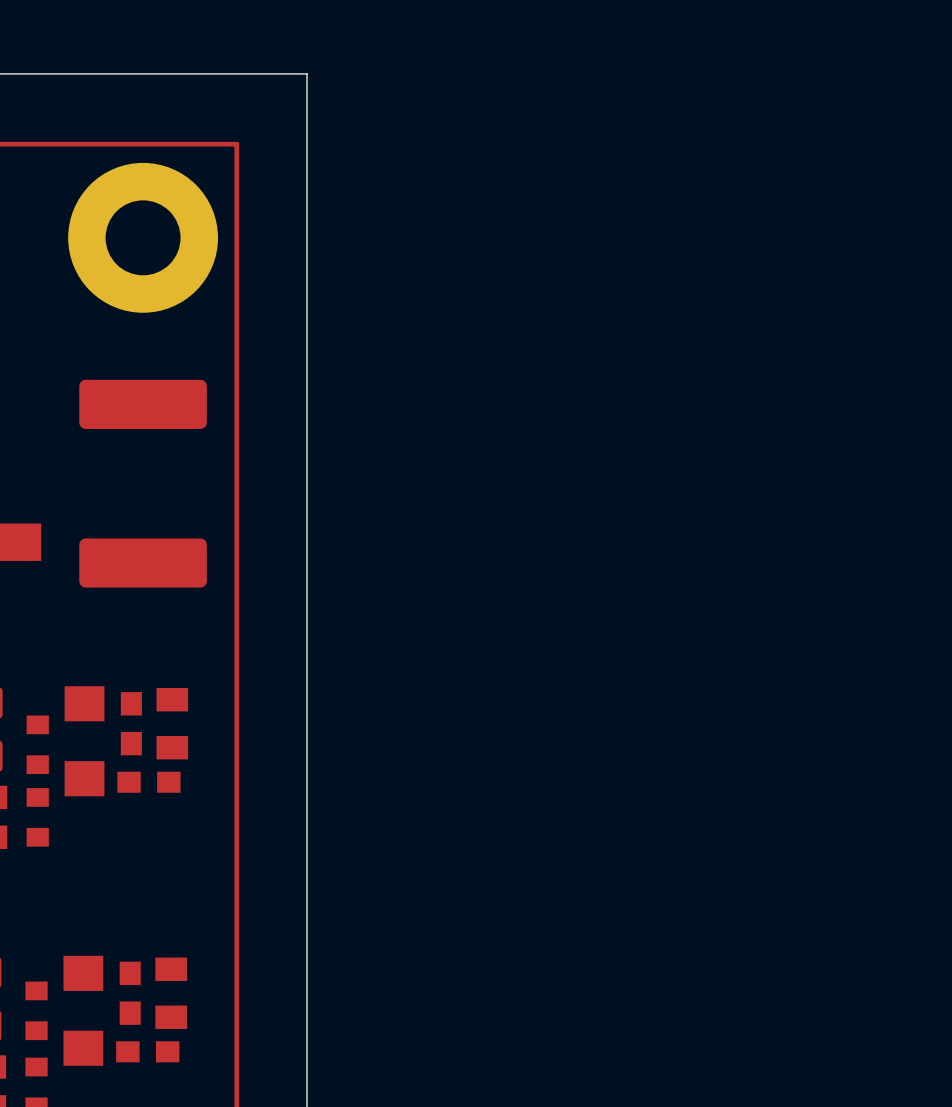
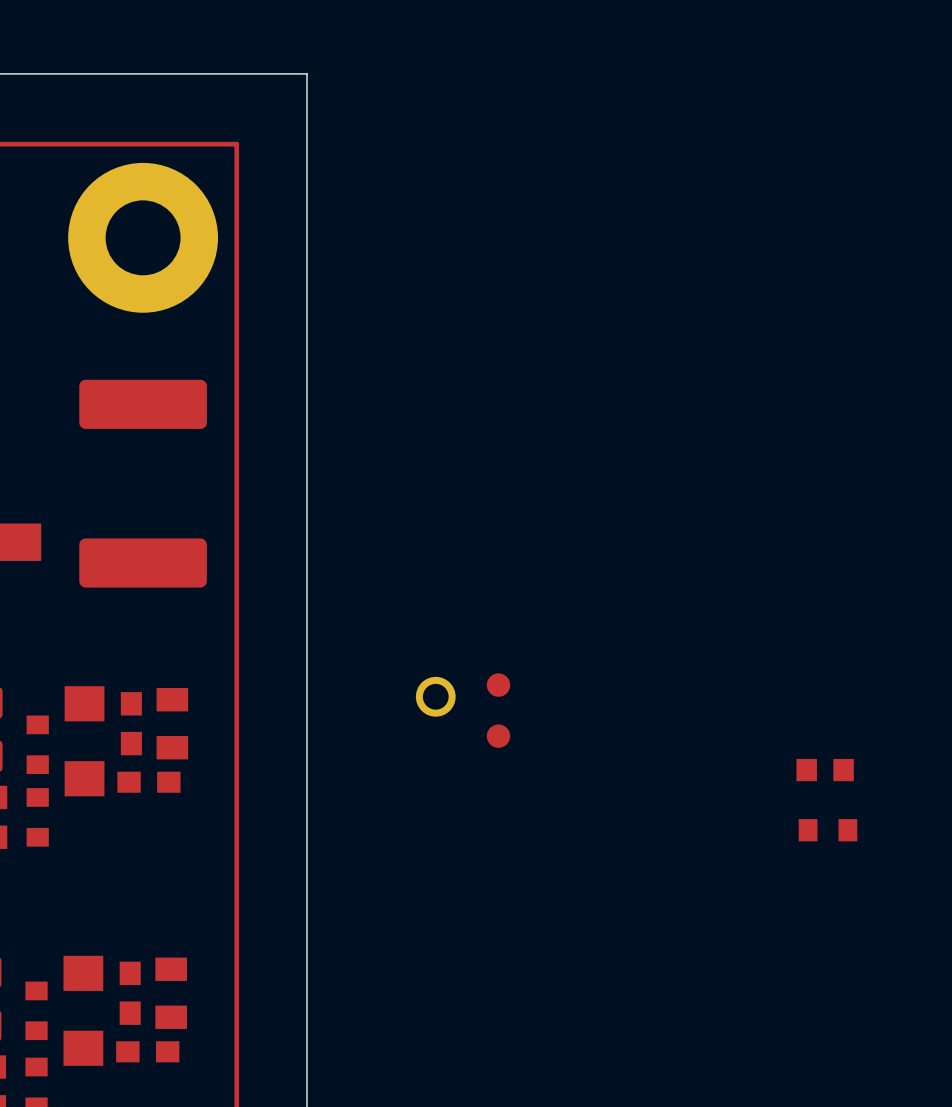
part: none -> (498, 685)
part: none -> (435, 696)
part: none -> (498, 736)
part: none -> (825, 770)
part: none -> (827, 830)

